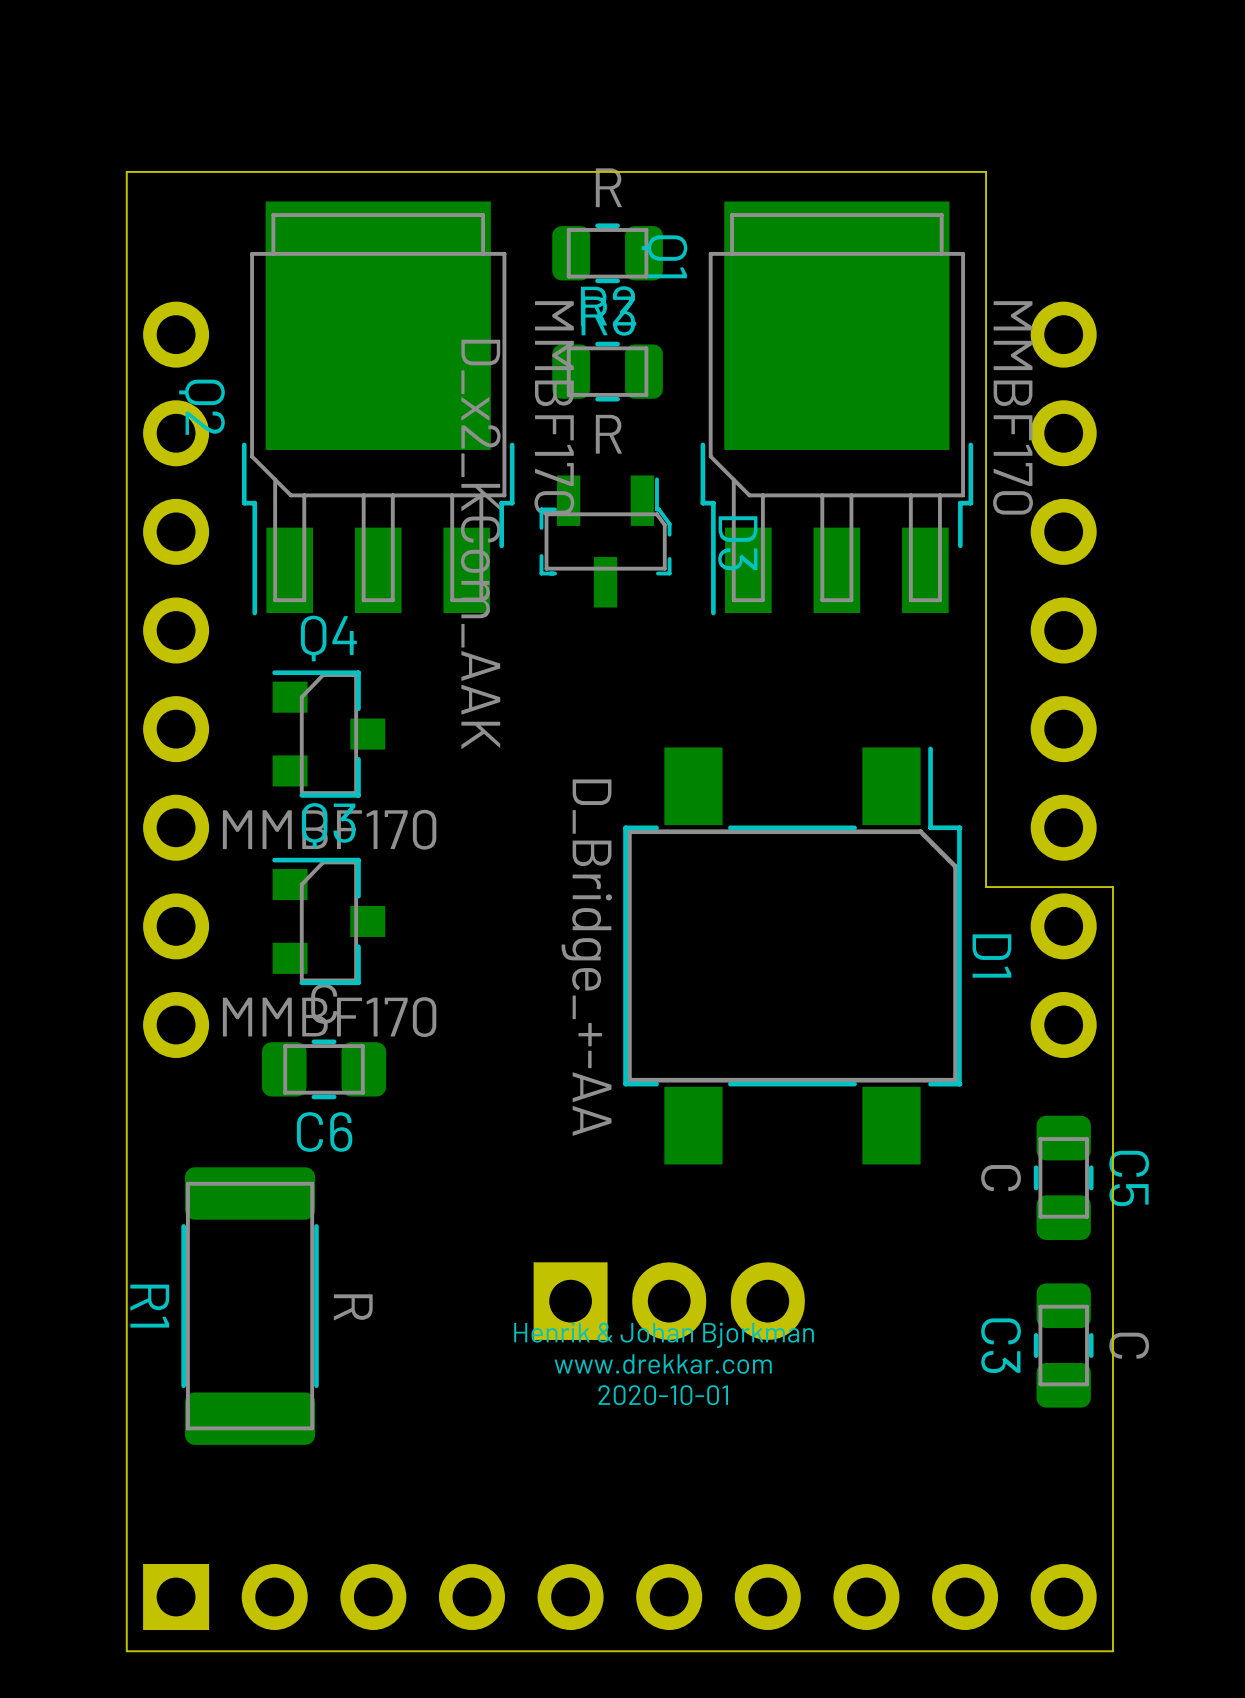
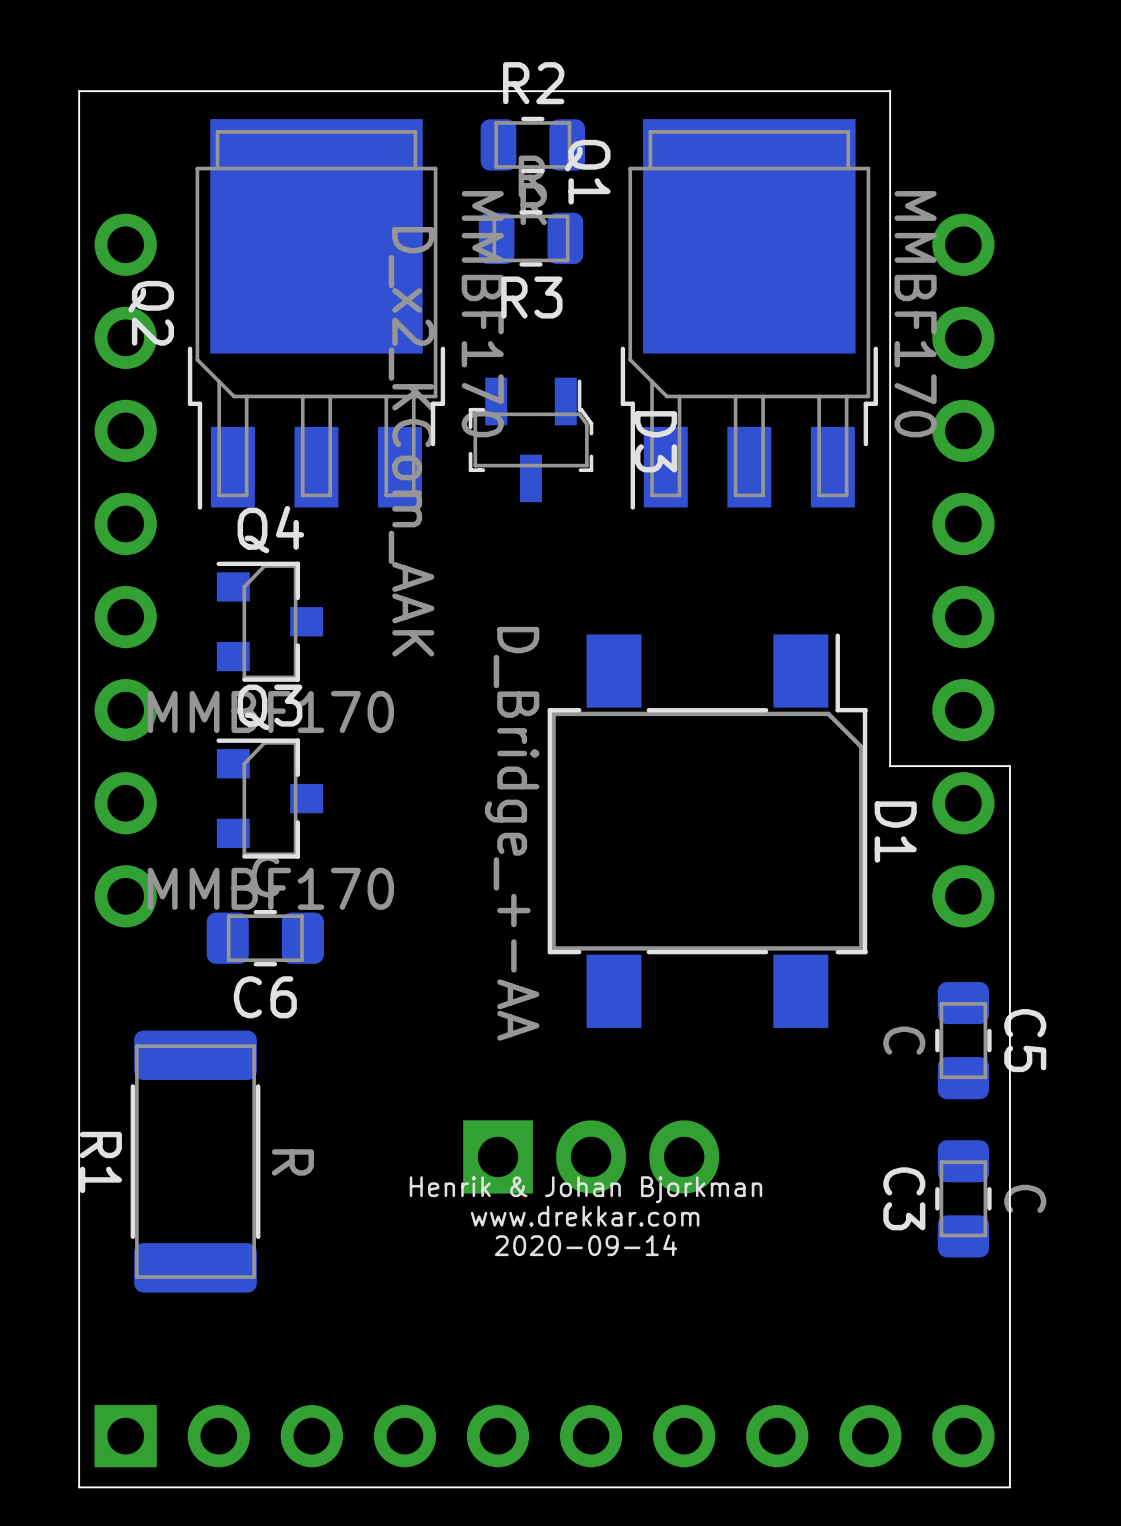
R3 position: (607, 253) -> (531, 238)
R2 position: (607, 371) -> (532, 144)
text: 2020-10-01 (663, 1395) -> 2020-09-14 (585, 1245)

